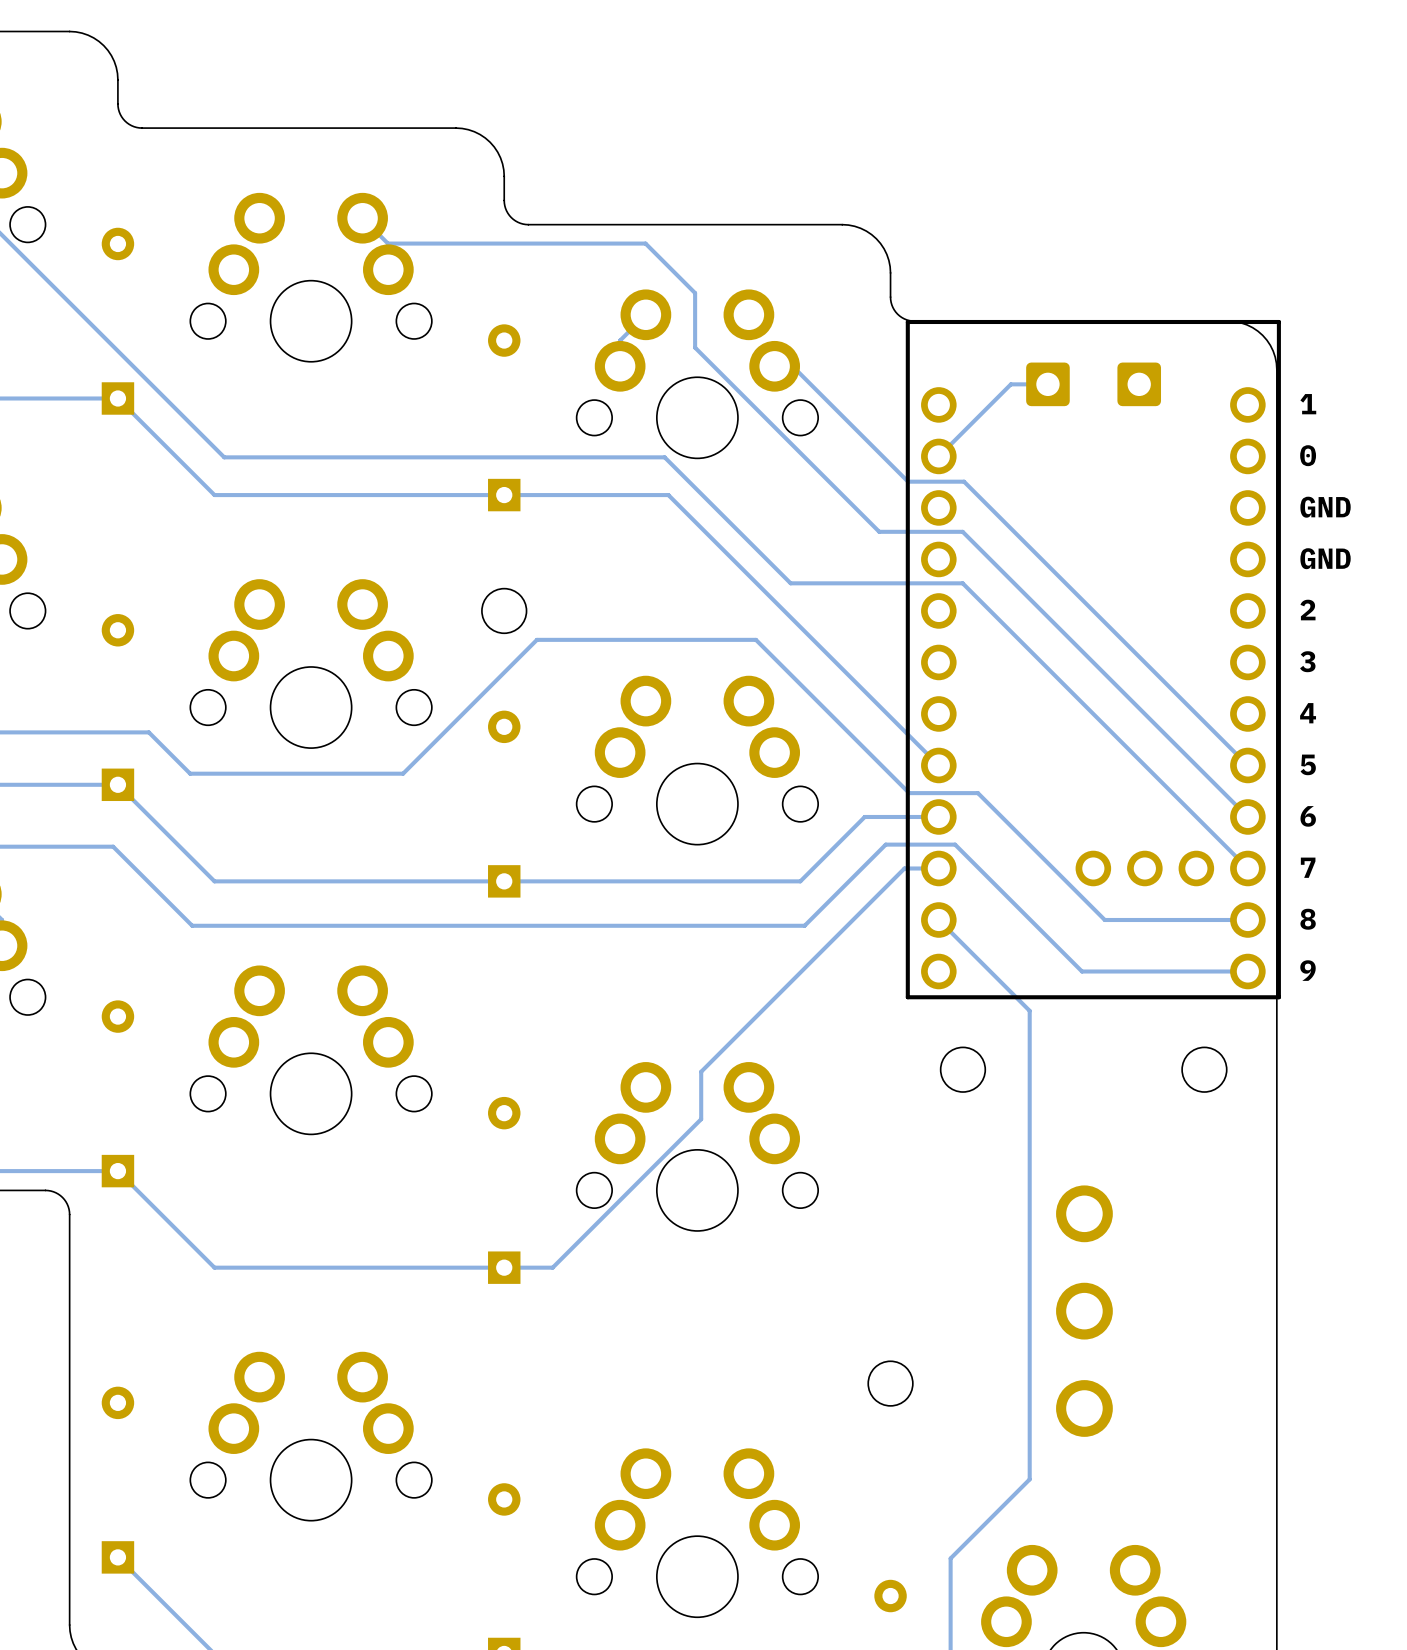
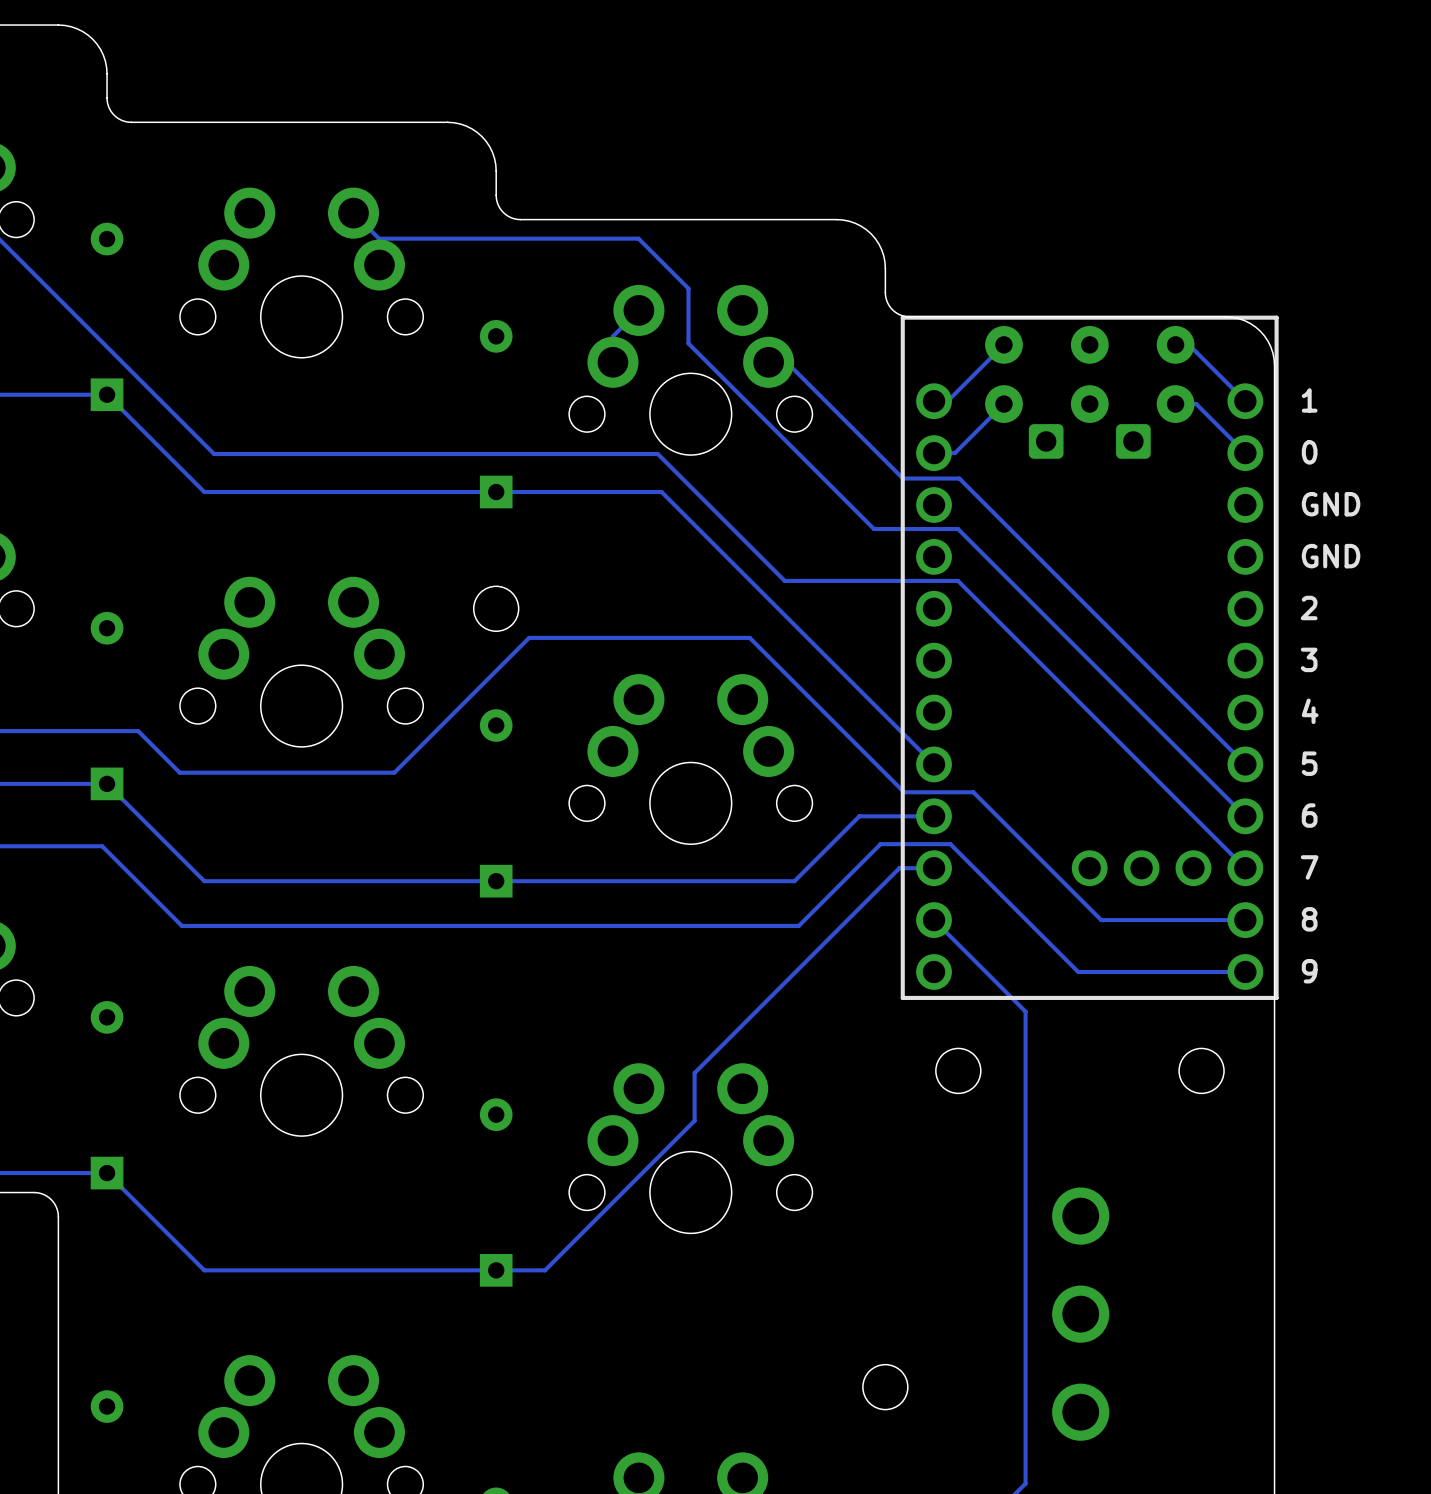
track: none -> (1003, 344) (947, 401) (934, 401)
part: none -> (1089, 344)
track: none -> (1175, 344) (1189, 344) (1245, 401)
track: (1047, 384) (1010, 384) (938, 456) -> (1003, 404) (954, 453) (934, 453)
part: (1047, 384) -> none
part: (1139, 384) -> none
part: none -> (1089, 404)
track: none -> (1175, 404) (1196, 404) (1245, 453)
part: none -> (1046, 441)
part: none -> (1133, 441)

